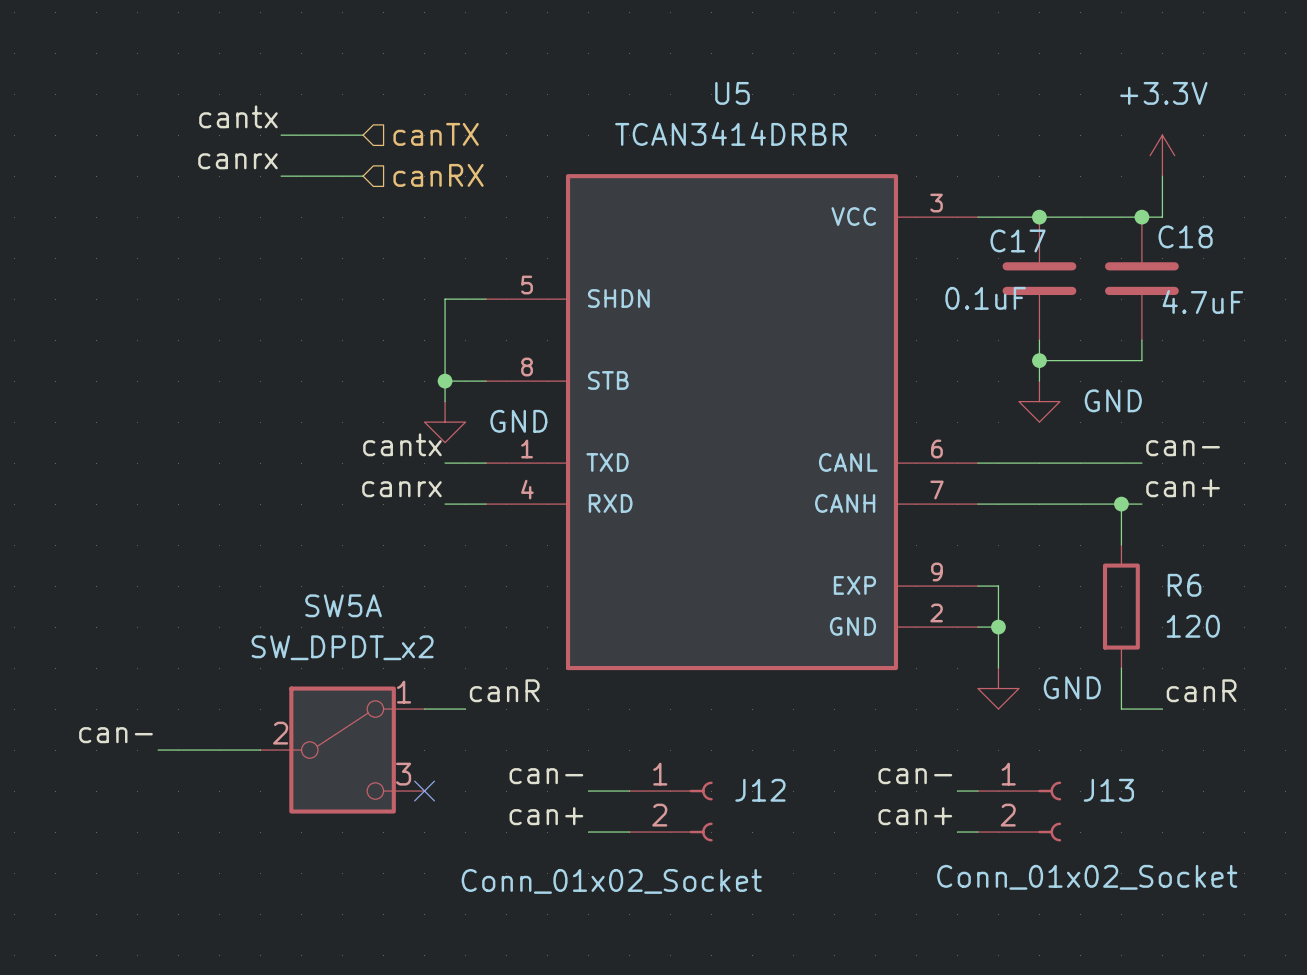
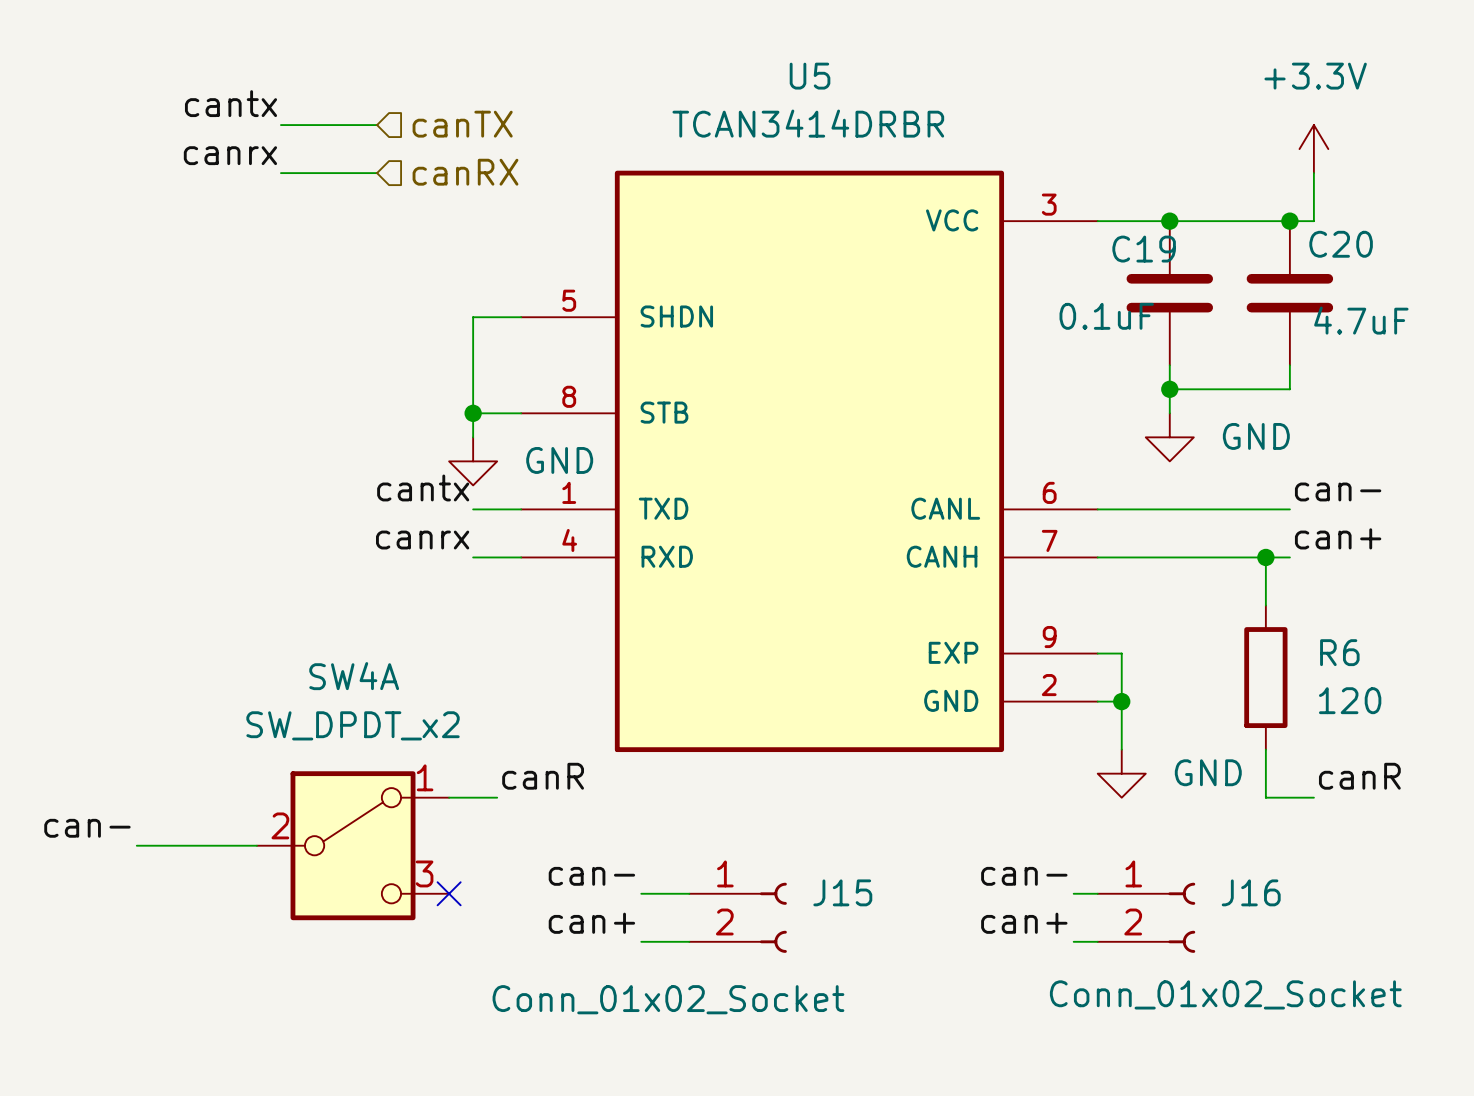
C18 name: C18 (1185, 236) -> C20 (1341, 244)
C17 name: C17 (1018, 240) -> C19 (1144, 249)
SW5A name: SW5A (343, 605) -> SW4A (354, 676)
J12 name: J12 (760, 790) -> J15 (842, 892)
J13 name: J13 (1108, 790) -> J16 (1251, 892)

